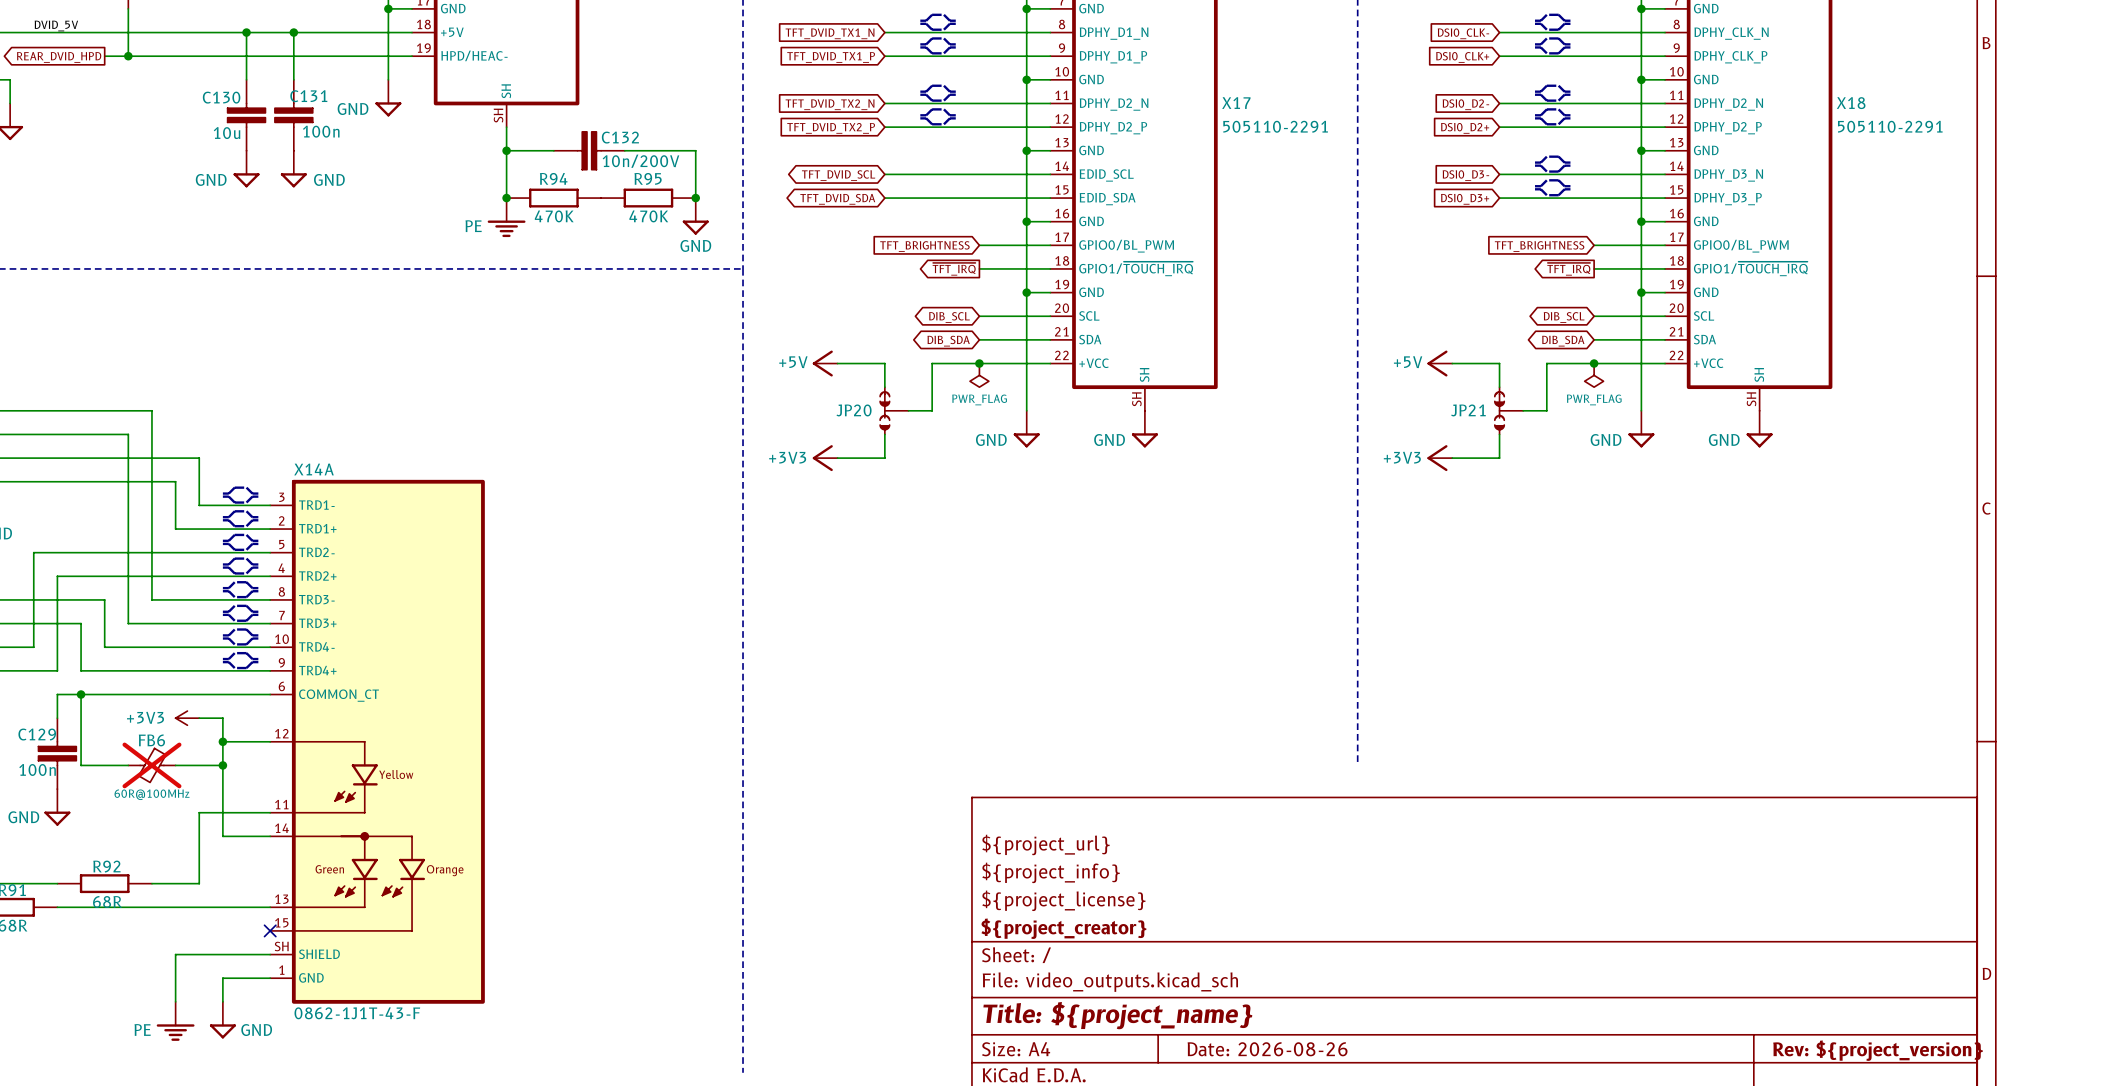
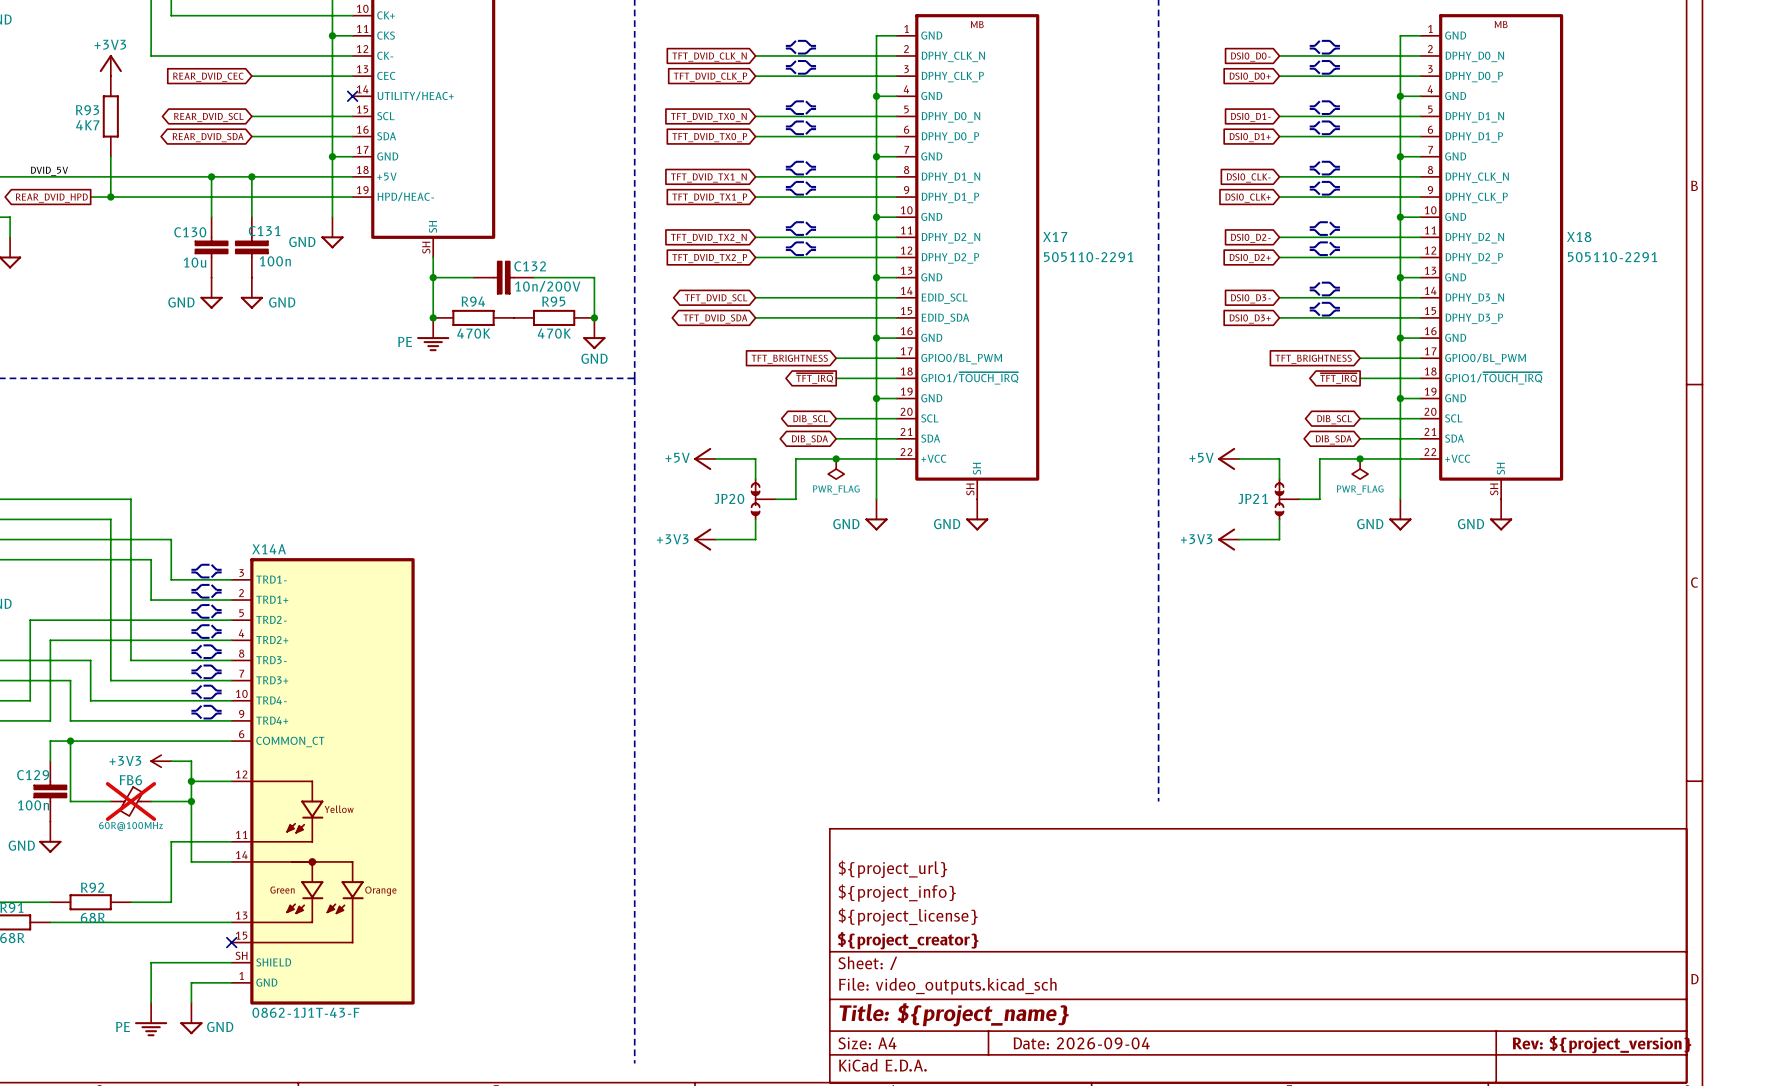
title block: Date: 2026-08-26 (1267, 1049) -> Date: 2026-09-04 (1081, 1043)

